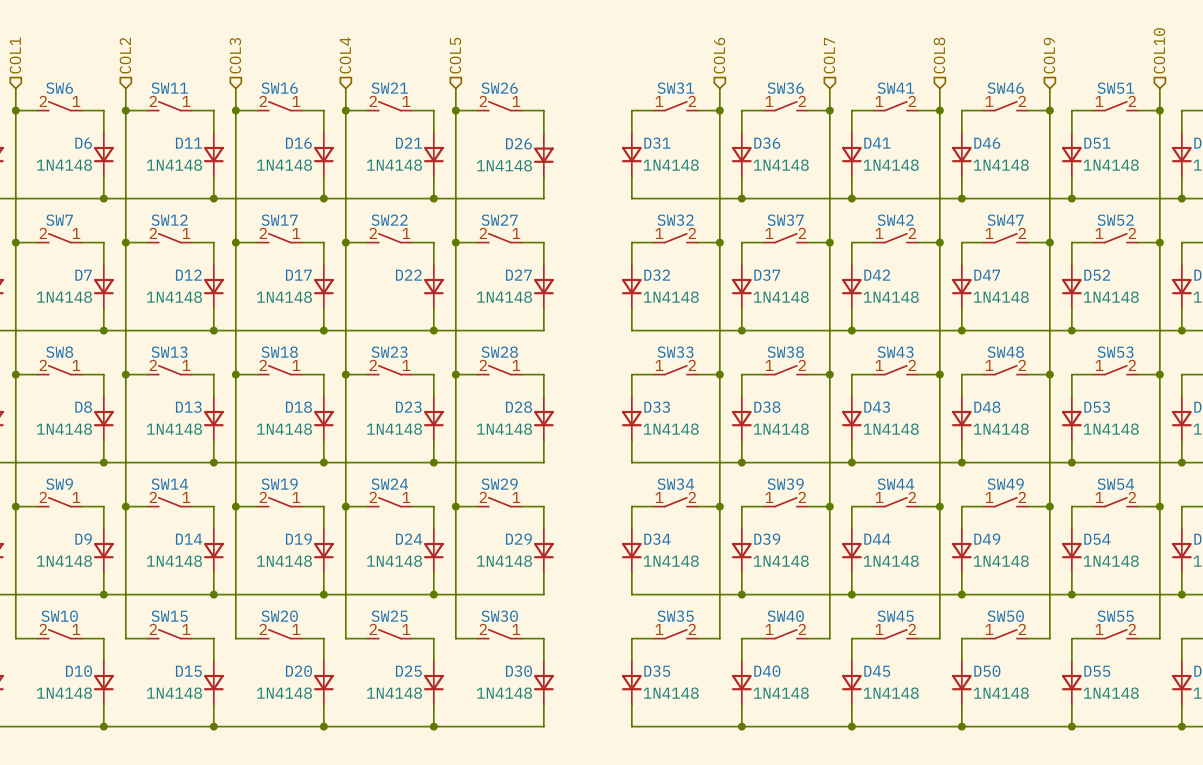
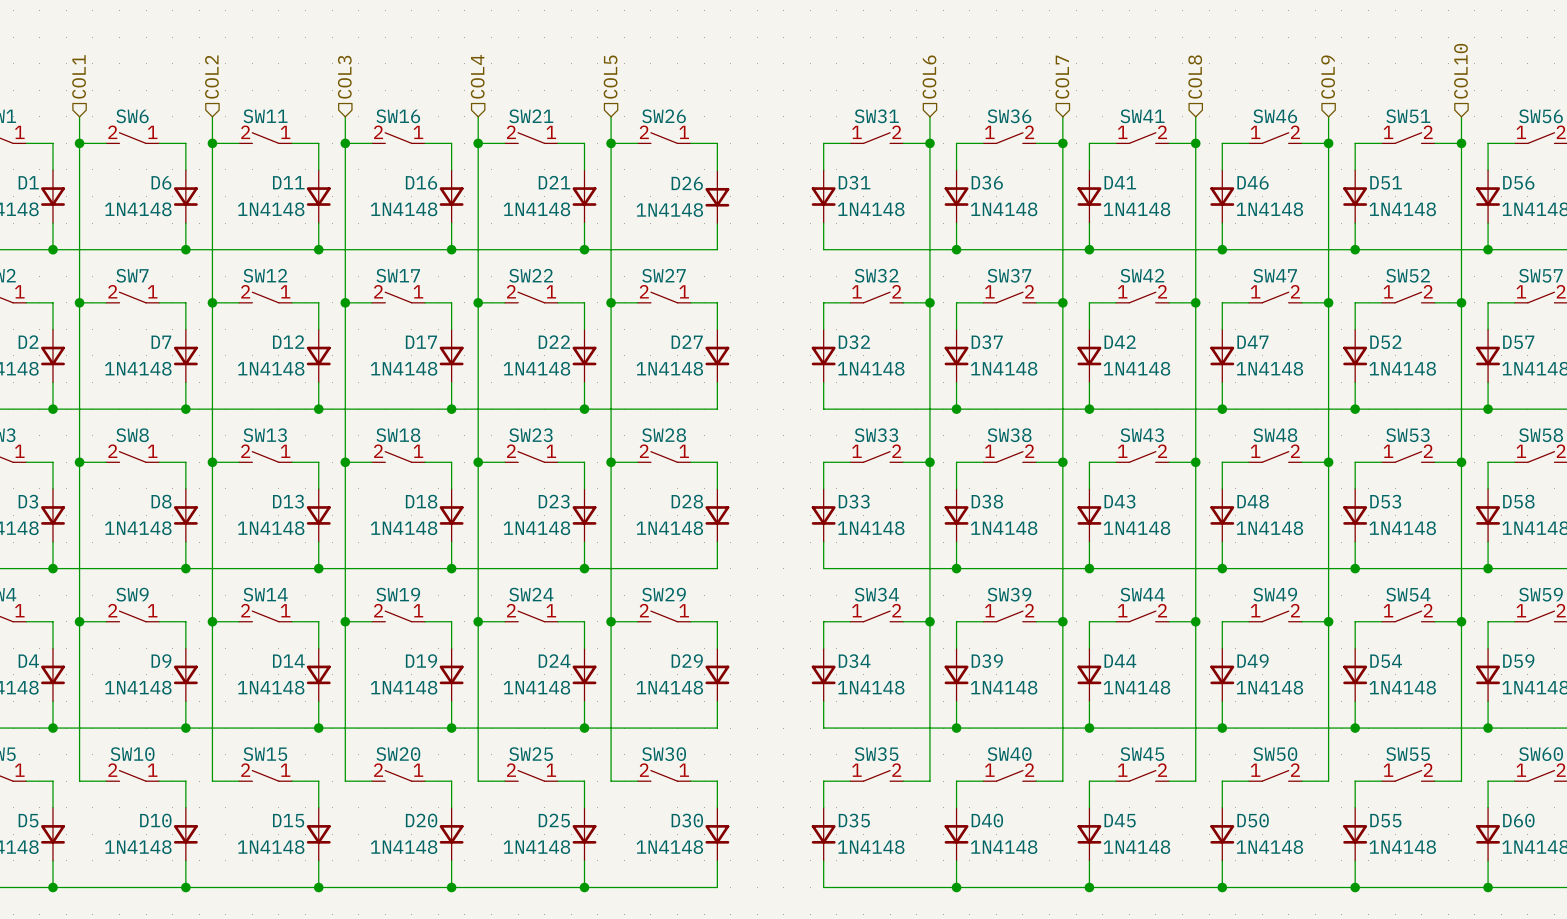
D22 value: none -> 1N4148 (536, 368)

